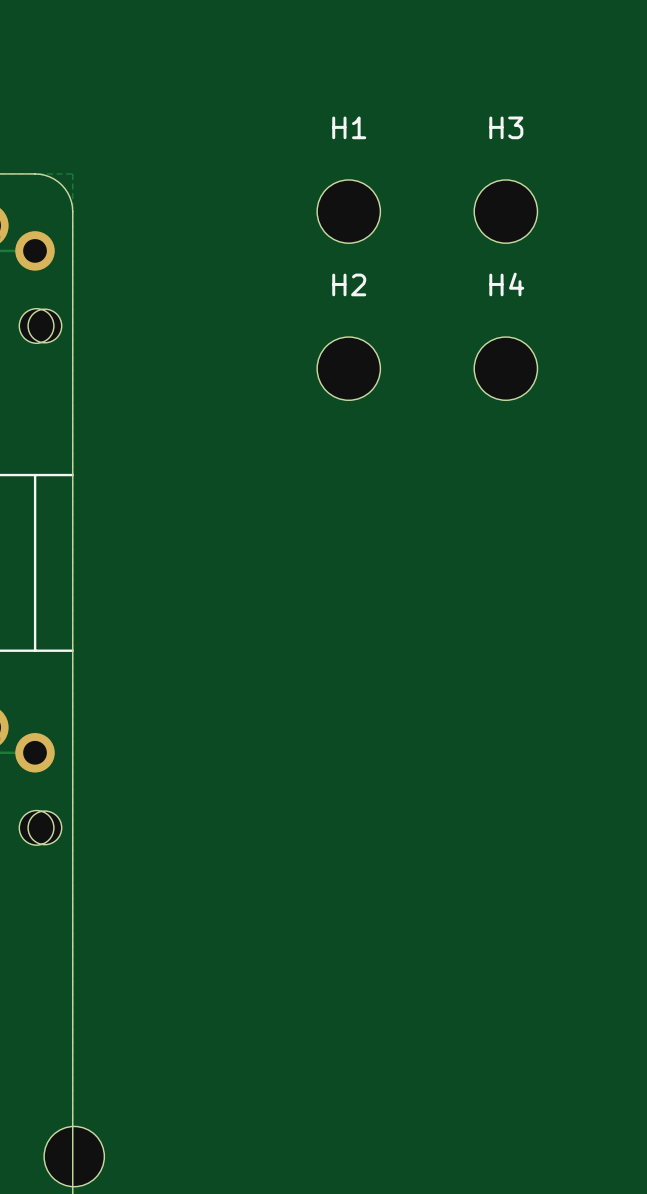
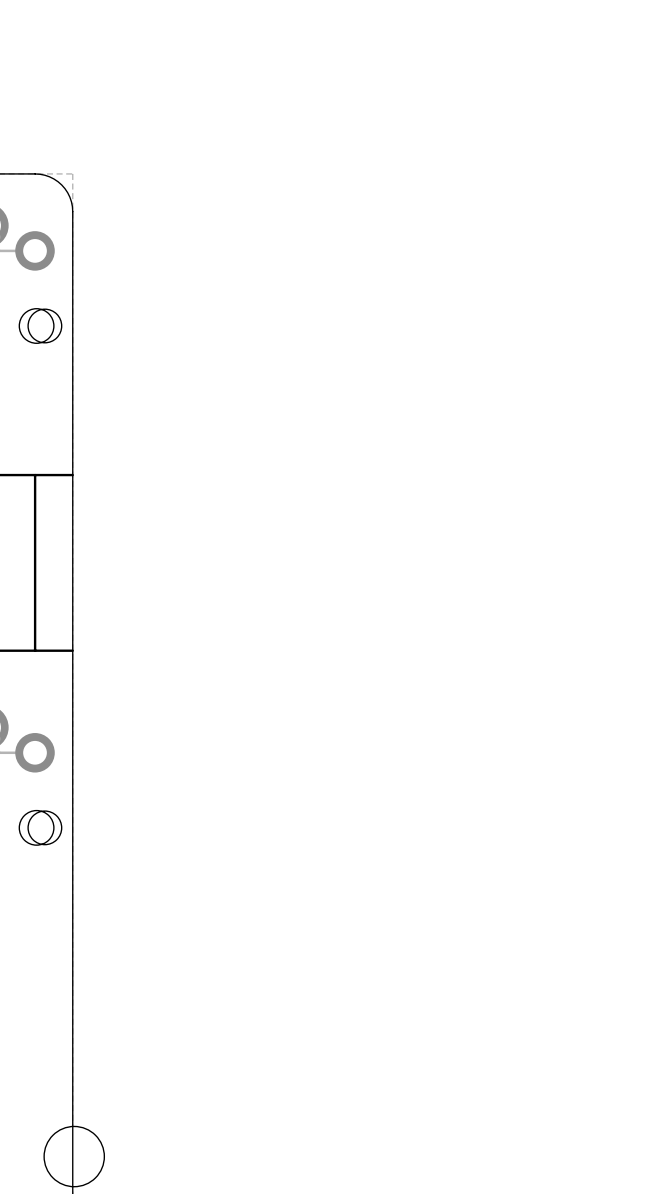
H1: (348, 211) -> none
H3: (505, 211) -> none
H2: (348, 368) -> none
H4: (505, 368) -> none

